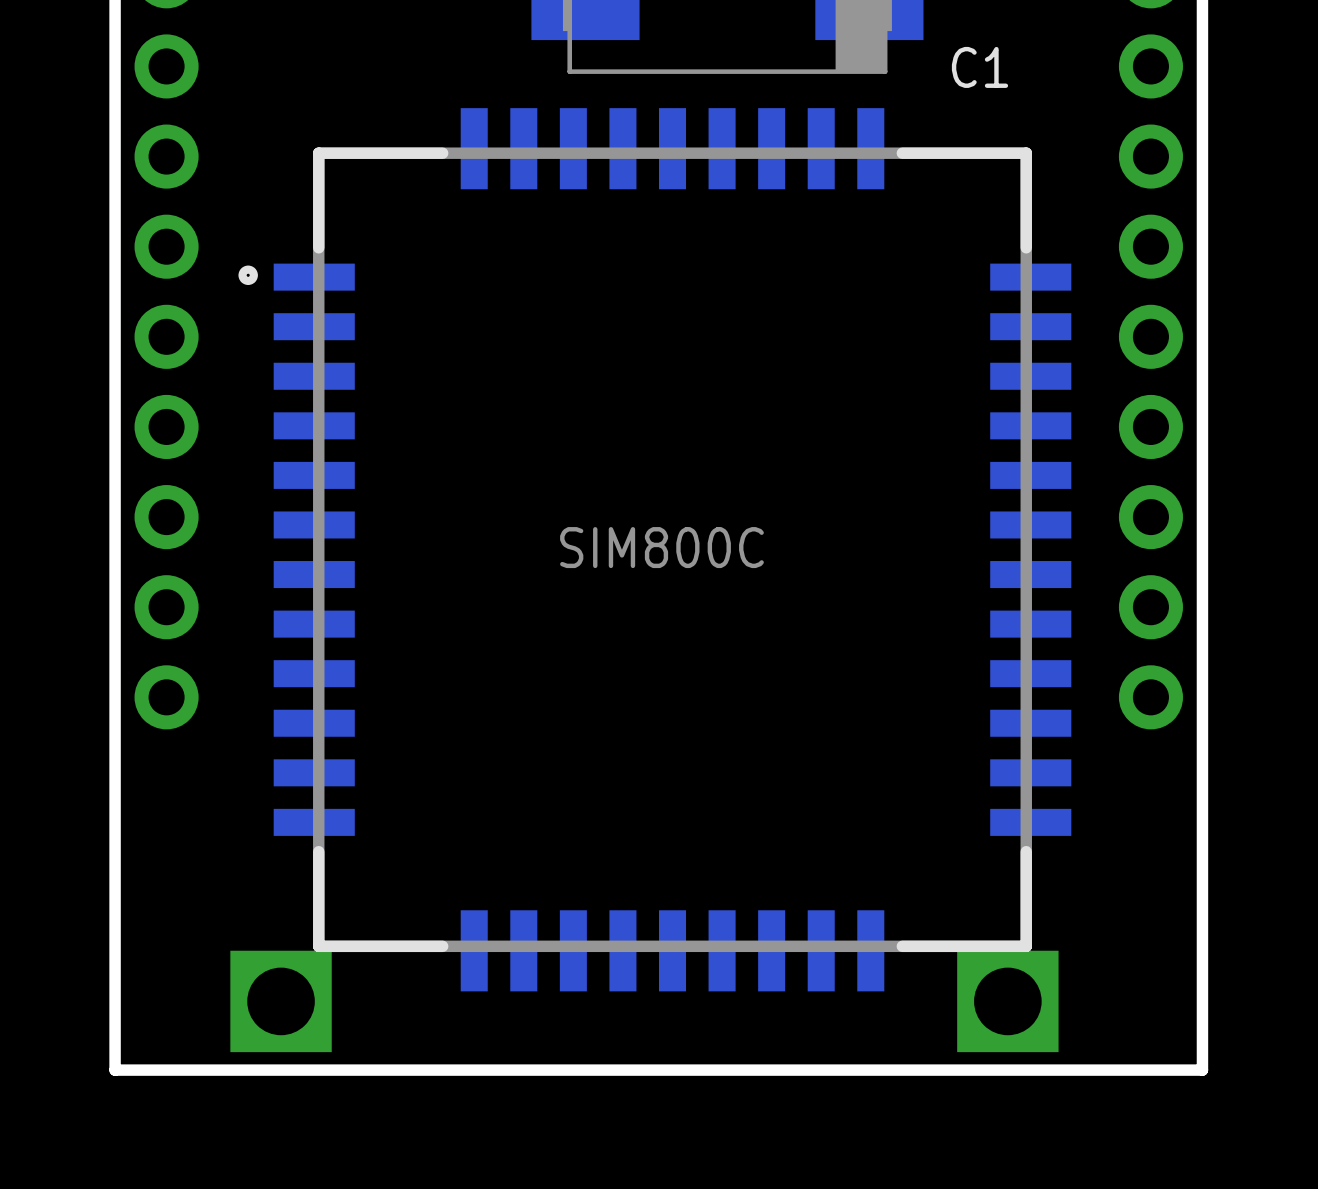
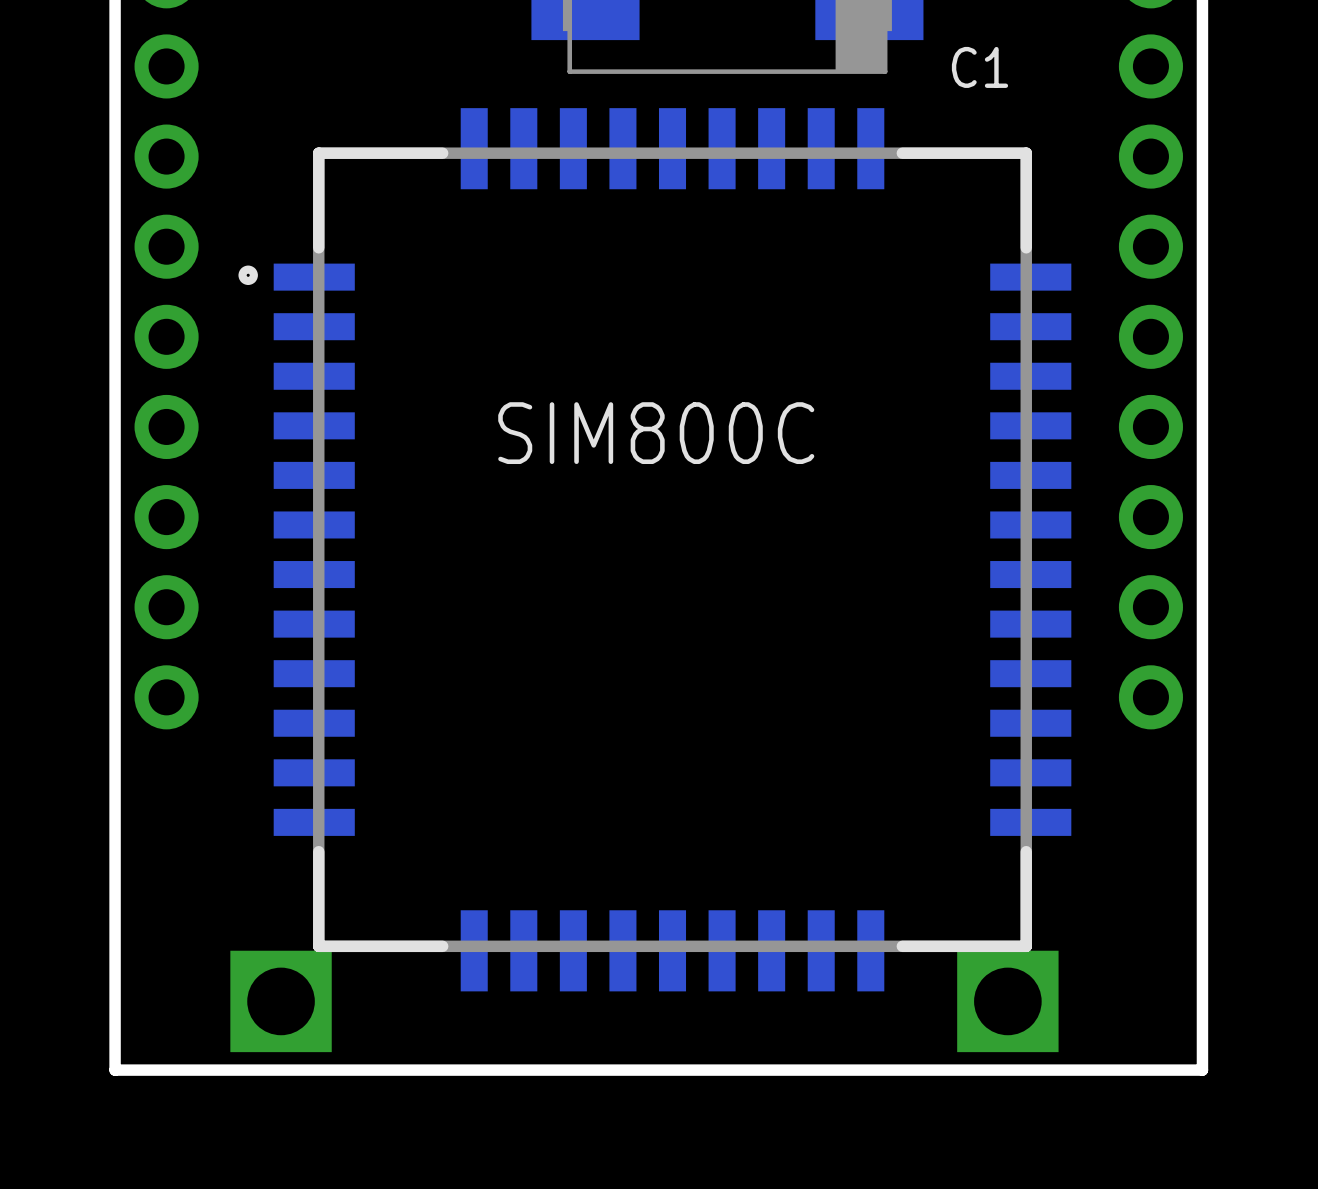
part text: none -> SIM800C (656, 433)
part value: SIM800C (661, 547) -> none

